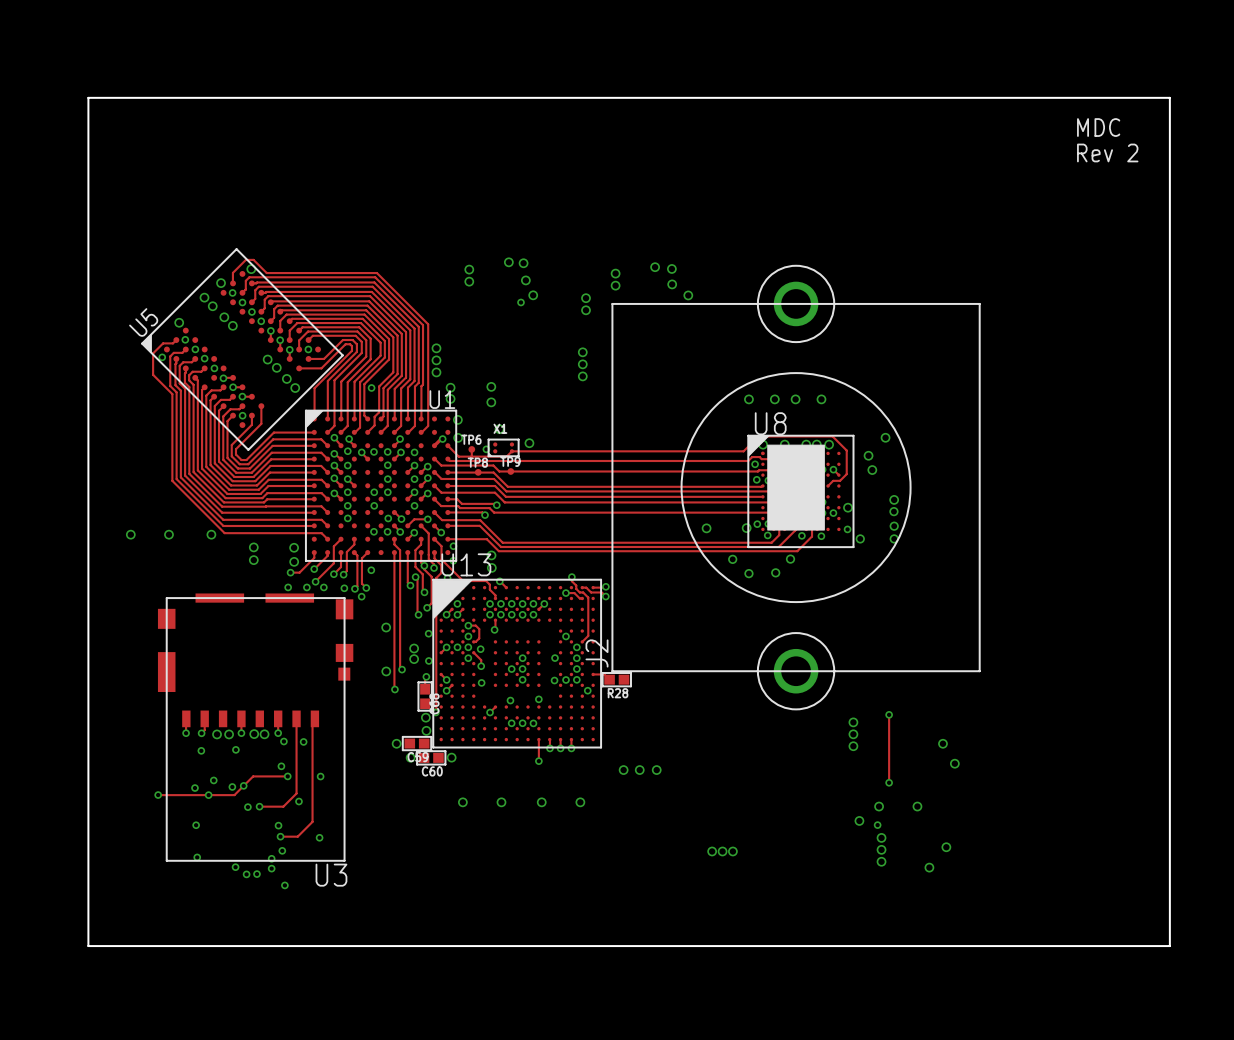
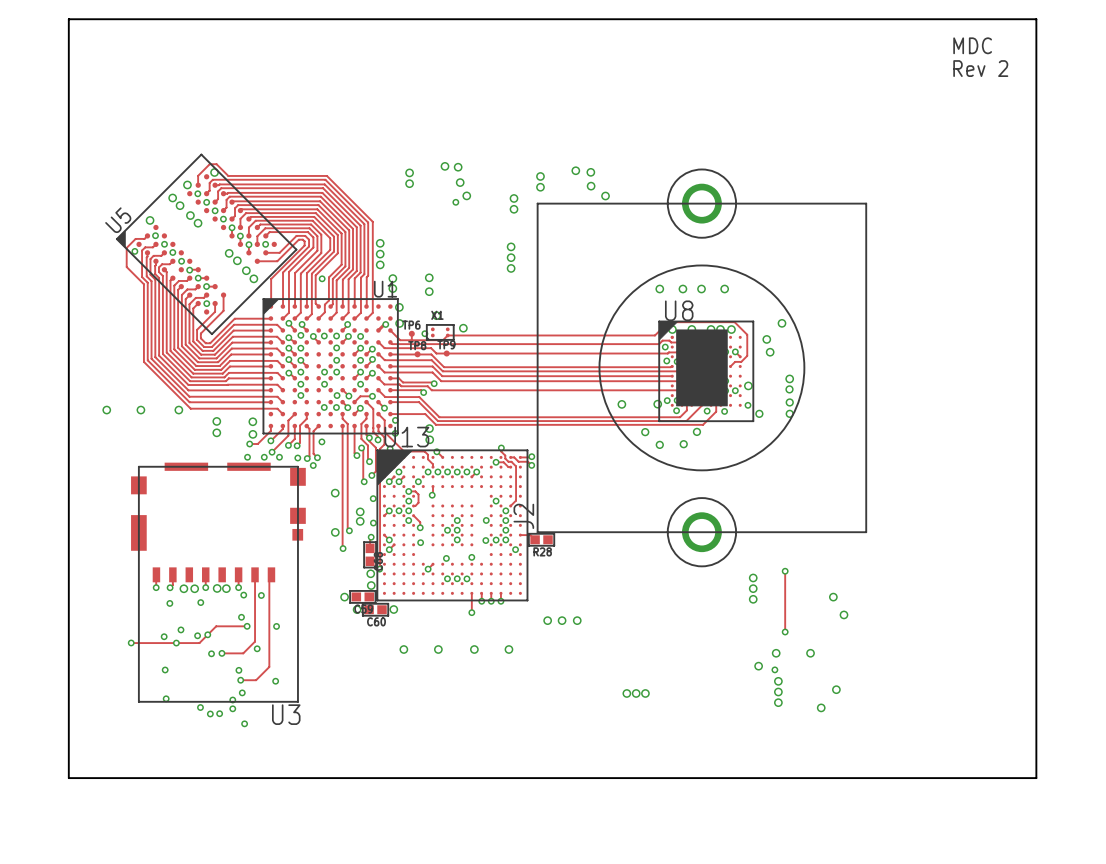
via: none -> (418, 481)
via: (490, 614) -> none
via: (500, 614) -> none
via: (511, 614) -> none
via: (522, 614) -> none
via: (533, 614) -> none
via: (480, 649) -> none

